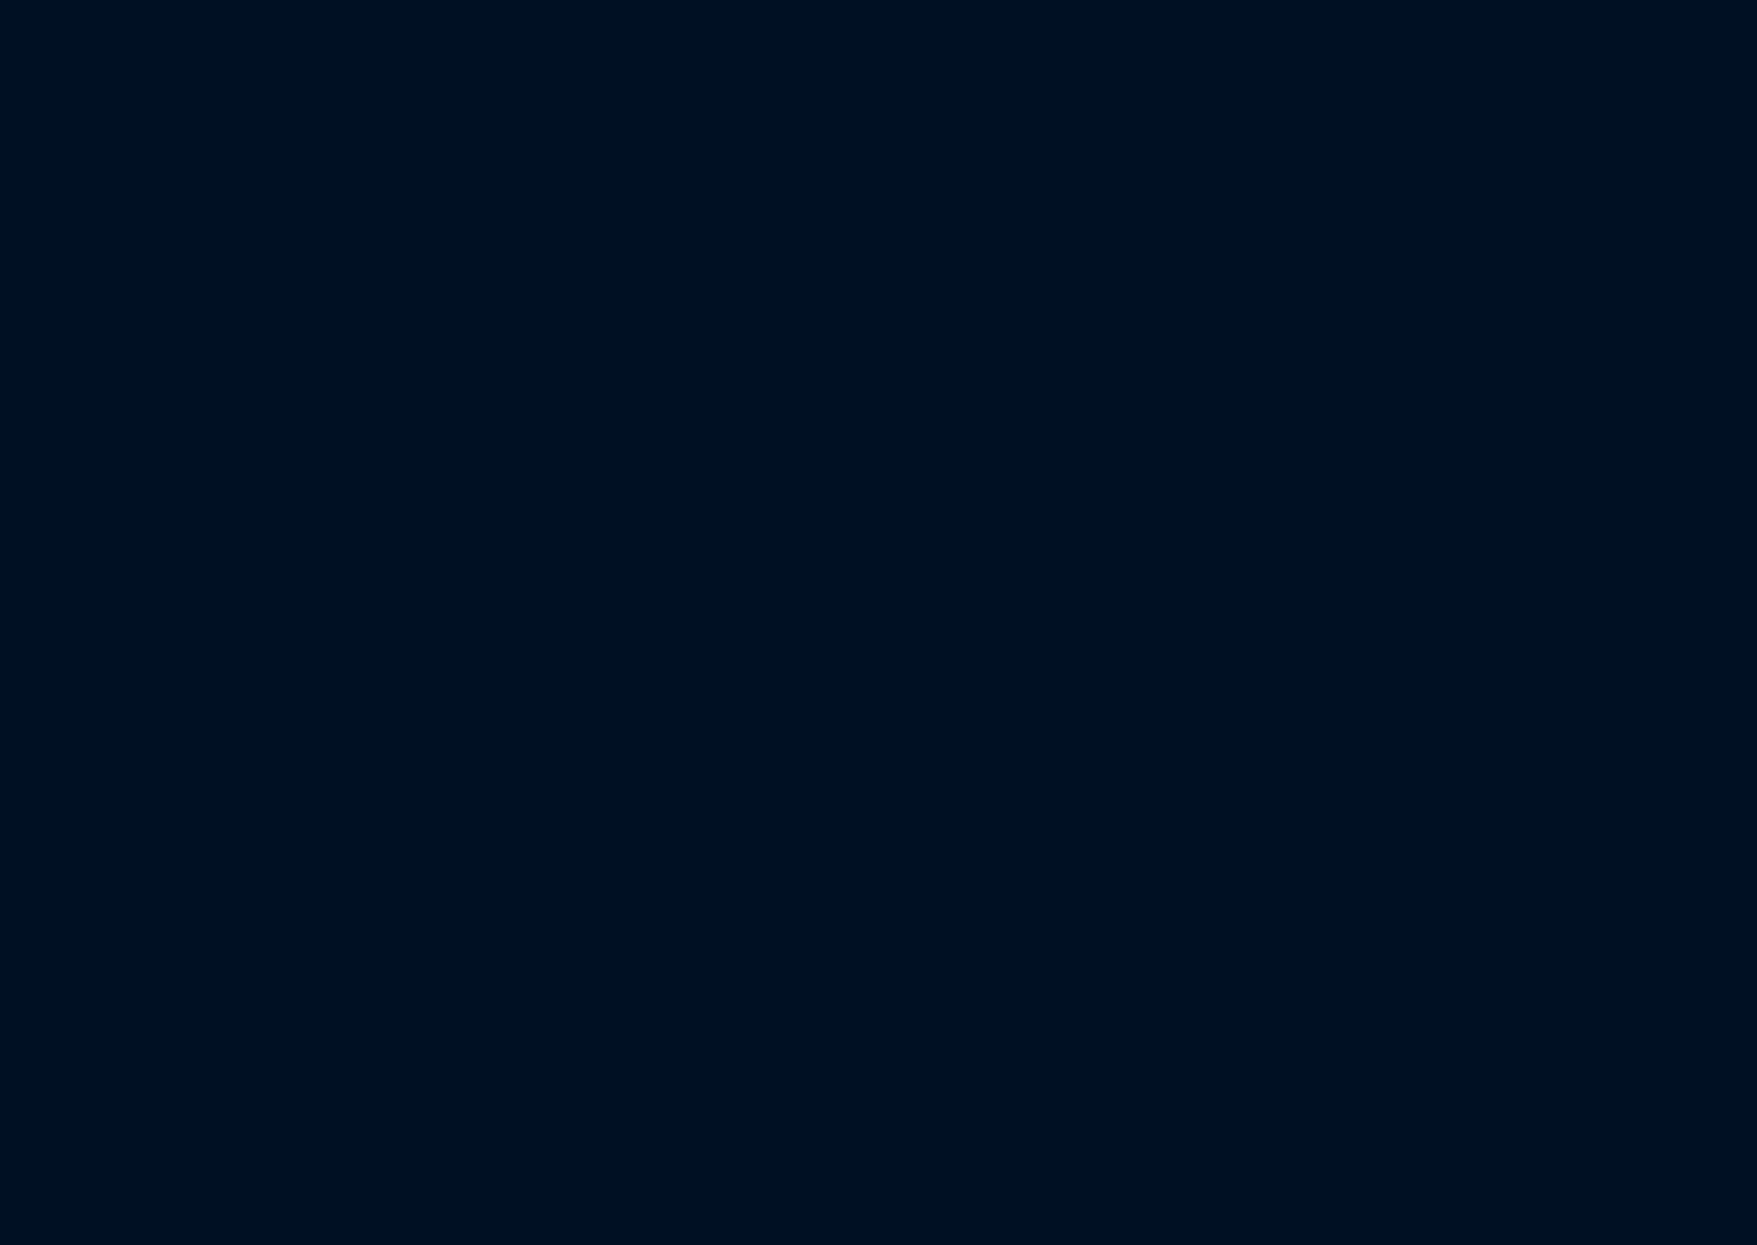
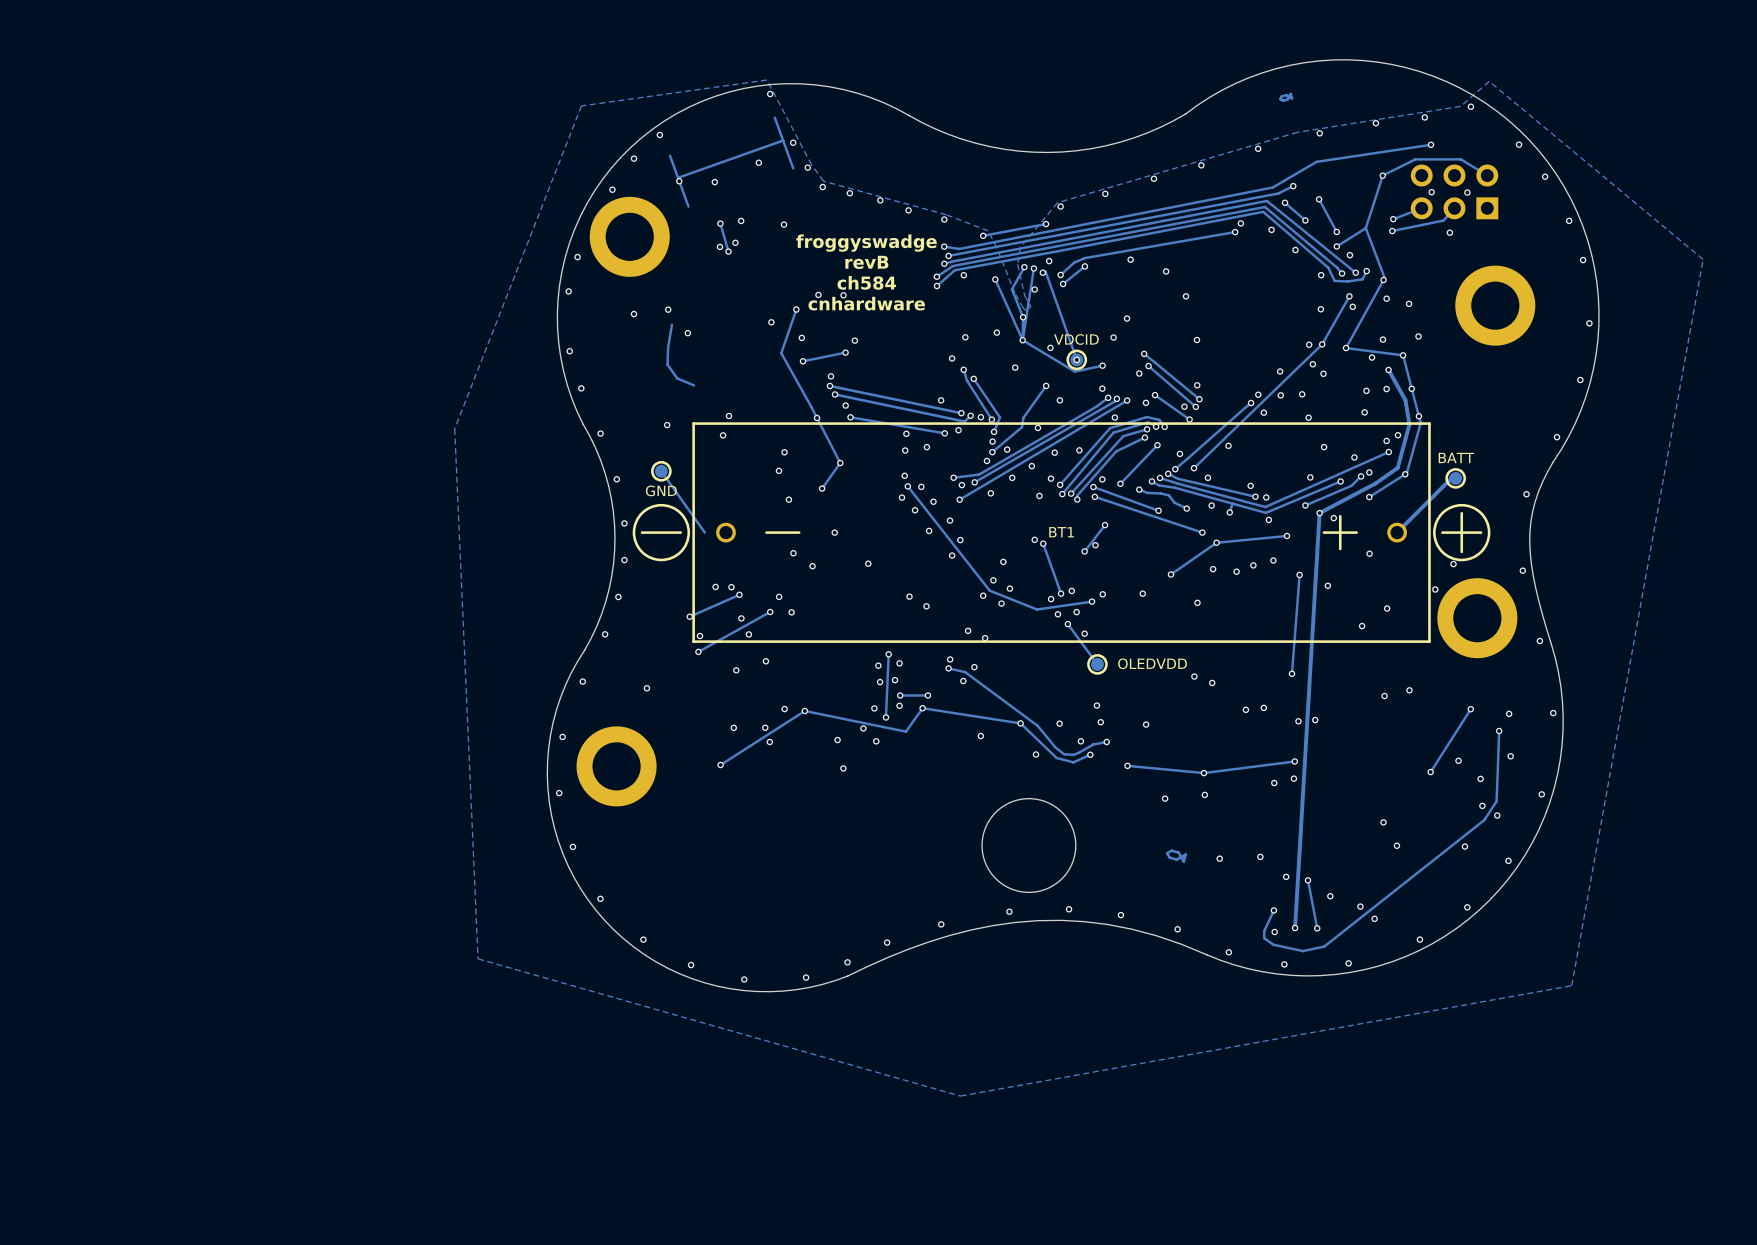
zone outline: none -> (766, 80) (811, 164) (823, 181) (946, 214) (988, 230) (1014, 293) (1025, 310) (1030, 306) (1024, 295) (1017, 264) (1020, 247) (1057, 202) (1297, 132) (1460, 106) (1489, 81) (1703, 259) (1571, 985) (960, 1096) (478, 958) (454, 428) (581, 105) (766, 80)
track: none -> (1290, 93) (1291, 98) (1286, 95) (1280, 99) (1287, 99) (1290, 93)
via: none -> (770, 94)
via: none -> (1470, 106)
board edge: none -> (1185, 114) (1159, 127) (1119, 142) (1076, 150) (1033, 152) (1004, 149) (962, 139) (935, 128) (883, 102) (843, 89) (800, 83) (757, 86) (729, 91) (702, 101) (664, 121) (630, 147) (610, 168) (594, 191) (574, 229) (565, 257) (558, 299) (557, 328) (560, 356) (567, 384) (576, 411) (600, 459) (608, 484) (614, 523) (614, 550) (609, 589) (601, 614) (590, 638) (565, 685) (556, 709) (548, 748) (547, 788) (554, 827) (562, 853) (573, 877) (587, 899) (604, 920) (623, 938) (644, 954) (667, 968) (704, 982) (743, 990) (783, 991) (809, 987) (835, 980) (908, 949) (971, 929) (1015, 922) (1060, 920) (1107, 924) (1131, 929) (1181, 944) (1234, 964) (1262, 971) (1305, 975) (1334, 974) (1363, 969) (1391, 961) (1418, 950) (1444, 936) (1467, 919) (1489, 900) (1508, 878) (1525, 854) (1539, 829) (1550, 802) (1557, 773) (1563, 730) (1562, 701) (1558, 672) (1538, 600) (1531, 563) (1530, 521) (1535, 501) (1542, 482) (1568, 437) (1580, 410) (1590, 383) (1597, 340) (1599, 311) (1596, 282) (1587, 239) (1577, 212) (1564, 186) (1547, 162) (1529, 140) (1508, 120) (1484, 102) (1459, 87) (1433, 76) (1405, 67) (1376, 62) (1347, 59) (1318, 60) (1290, 65) (1262, 72) (1234, 83) (1209, 97) (1185, 114)
track: none -> (774, 117) (793, 168)
via: none -> (1424, 117)
via: none -> (1375, 123)
via: none -> (1319, 133)
via: none -> (659, 134)
track: none -> (783, 140) (678, 177)
via: none -> (793, 142)
track: none -> (1431, 144) (1316, 161) (1272, 187) (959, 248) (944, 246)
via: none -> (1431, 144)
via: none -> (1519, 144)
via: none -> (1258, 148)
track: none -> (670, 155) (688, 206)
via: none -> (634, 158)
via: none -> (758, 162)
via: none -> (1201, 165)
via: none -> (807, 167)
via: none -> (1382, 175)
track: none -> (1487, 175) (1460, 159) (1415, 159) (1382, 175) (1365, 228)
via: none -> (1545, 176)
via: none -> (1153, 178)
via: none -> (679, 181)
via: none -> (714, 182)
track: none -> (1293, 186) (1278, 193) (948, 255)
via: none -> (1293, 186)
via: none -> (822, 187)
via: none -> (612, 189)
part: none -> (1454, 191)
via: none -> (1431, 192)
via: none -> (1467, 192)
via: none -> (849, 193)
via: none -> (1105, 193)
track: none -> (1319, 199) (1336, 231)
via: none -> (1319, 199)
via: none -> (880, 200)
track: none -> (1285, 202) (1305, 220)
via: none -> (1285, 202)
via: none -> (1060, 206)
track: none -> (1421, 208) (1393, 219)
track: none -> (1454, 208) (1443, 220) (1392, 231)
via: none -> (908, 210)
via: none -> (944, 219)
via: none -> (1393, 219)
via: none -> (741, 220)
via: none -> (1305, 220)
via: none -> (1569, 220)
track: none -> (720, 223) (728, 251)
via: none -> (720, 223)
via: none -> (1240, 223)
via: none -> (784, 224)
track: none -> (1046, 224) (983, 235)
via: none -> (1046, 224)
track: none -> (1365, 228) (1384, 278) (1346, 348) (1403, 355) (1420, 423) (1406, 472) (1369, 497)
track: none -> (1365, 228) (1336, 246)
via: none -> (1271, 229)
via: none -> (1336, 231)
via: none -> (1392, 231)
track: none -> (1235, 232) (1084, 258) (1074, 262) (1060, 274)
via: none -> (1235, 232)
via: none -> (1449, 232)
via: none -> (983, 235)
part: none -> (629, 236)
via: none -> (735, 242)
text: none -> froggyswadge (866, 243)
via: none -> (719, 246)
via: none -> (944, 246)
via: none -> (1336, 246)
via: none -> (1295, 250)
via: none -> (728, 251)
via: none -> (948, 255)
via: none -> (1349, 255)
via: none -> (577, 257)
via: none -> (1130, 259)
via: none -> (1583, 260)
via: none -> (1049, 261)
text: none -> revB (866, 262)
track: none -> (944, 263) (1266, 200) (1355, 272)
via: none -> (944, 263)
track: none -> (1084, 266) (1063, 283)
via: none -> (1084, 266)
track: none -> (1024, 267) (1011, 289) (1023, 317) (1022, 340)
via: none -> (1024, 267)
track: none -> (1033, 268) (1022, 340)
via: none -> (1033, 268)
via: none -> (1166, 271)
track: none -> (1366, 271) (1362, 279) (1334, 280) (1328, 267) (1263, 211) (954, 270) (936, 286)
via: none -> (1366, 271)
track: none -> (1042, 272) (1045, 271) (1076, 359)
via: none -> (1042, 272)
via: none -> (1355, 272)
track: none -> (1342, 273) (1265, 207) (952, 266) (936, 276)
via: none -> (1342, 273)
via: none -> (1060, 274)
via: none -> (963, 275)
via: none -> (1321, 275)
via: none -> (936, 276)
track: none -> (995, 279) (1022, 340)
via: none -> (995, 279)
via: none -> (1383, 280)
text: none -> ch584 (866, 282)
via: none -> (1063, 283)
via: none -> (936, 286)
via: none -> (1034, 289)
via: none -> (568, 291)
via: none -> (818, 294)
via: none -> (843, 295)
via: none -> (1186, 296)
track: none -> (1349, 296) (1322, 344) (1194, 468)
via: none -> (1349, 296)
via: none -> (1386, 298)
text: none -> cnhardware (866, 303)
via: none -> (1409, 303)
part: none -> (1495, 305)
via: none -> (1352, 306)
via: none -> (668, 309)
track: none -> (796, 309) (781, 353) (840, 463) (822, 488)
via: none -> (796, 309)
via: none -> (1320, 309)
via: none -> (634, 314)
via: none -> (1023, 317)
via: none -> (1127, 318)
via: none -> (771, 322)
via: none -> (1589, 323)
track: none -> (671, 324) (667, 364) (677, 378) (694, 385)
via: none -> (996, 332)
via: none -> (687, 333)
via: none -> (1418, 336)
via: none -> (801, 337)
via: none -> (965, 337)
via: none -> (1113, 337)
via: none -> (1196, 339)
via: none -> (1382, 339)
via: none -> (854, 340)
track: none -> (1022, 340) (1074, 371) (1102, 365)
via: none -> (1022, 340)
via: none -> (1309, 344)
via: none -> (1322, 344)
via: none -> (1050, 347)
via: none -> (1346, 348)
via: none -> (569, 351)
track: none -> (845, 352) (802, 361)
via: none -> (845, 352)
track: none -> (1144, 353) (1199, 399)
via: none -> (1144, 353)
via: none -> (1403, 355)
via: none -> (1372, 357)
via: none -> (952, 358)
part: none -> VDCID (1076, 359)
via: none -> (1076, 359)
via: none -> (802, 361)
via: none -> (1312, 364)
via: none -> (1102, 365)
track: none -> (1148, 366) (1195, 406)
via: none -> (1148, 366)
via: none -> (1015, 367)
track: none -> (963, 369) (967, 380) (991, 419)
via: none -> (963, 369)
track: none -> (1388, 369) (1405, 400) (1409, 424) (1397, 467) (1375, 483) (1319, 513) (1295, 928)
via: none -> (1388, 369)
via: none -> (1280, 371)
via: none -> (1139, 373)
via: none -> (1323, 373)
via: none -> (831, 376)
track: none -> (973, 378) (999, 417) (994, 431)
via: none -> (973, 378)
via: none -> (1580, 380)
track: none -> (829, 385) (961, 413)
via: none -> (829, 385)
track: none -> (1046, 385) (1023, 417) (1022, 427) (992, 452)
via: none -> (1046, 385)
via: none -> (1197, 385)
via: none -> (581, 388)
via: none -> (1102, 388)
via: none -> (1411, 388)
via: none -> (1386, 389)
via: none -> (1366, 390)
track: none -> (835, 394) (964, 421) (970, 415)
via: none -> (835, 394)
via: none -> (1258, 394)
via: none -> (1302, 394)
track: none -> (1155, 395) (1189, 419)
via: none -> (1155, 395)
via: none -> (1280, 395)
track: none -> (1108, 397) (1096, 406) (979, 474) (953, 477)
via: none -> (1108, 397)
track: none -> (1116, 398) (974, 482)
via: none -> (1116, 398)
via: none -> (1199, 399)
via: none -> (941, 400)
via: none -> (1059, 400)
track: none -> (1127, 400) (959, 499)
via: none -> (1127, 400)
via: none -> (1145, 402)
track: none -> (1251, 402) (1175, 469)
via: none -> (1251, 402)
via: none -> (845, 405)
via: none -> (1184, 406)
via: none -> (1195, 406)
via: none -> (1263, 412)
via: none -> (1364, 412)
via: none -> (961, 413)
via: none -> (970, 415)
via: none -> (729, 416)
via: none -> (1418, 416)
via: none -> (817, 417)
track: none -> (850, 417) (944, 433)
via: none -> (850, 417)
via: none -> (980, 417)
via: none -> (1114, 417)
via: none -> (1308, 417)
via: none -> (991, 419)
via: none -> (1189, 419)
via: none -> (667, 425)
track: none -> (1156, 426) (1148, 422) (1113, 432) (1062, 494)
via: none -> (1156, 426)
track: none -> (1164, 426) (1159, 419) (1146, 417) (1110, 428) (1060, 484)
via: none -> (1164, 426)
via: none -> (1037, 427)
track: none -> (1147, 429) (1123, 436) (1071, 493)
via: none -> (1147, 429)
via: none -> (958, 430)
via: none -> (994, 431)
via: none -> (600, 433)
via: none -> (906, 433)
via: none -> (944, 433)
via: none -> (723, 435)
via: none -> (1397, 435)
track: none -> (1144, 437) (1116, 451) (1077, 495) (1077, 499)
via: none -> (1144, 437)
via: none -> (1557, 437)
via: none -> (1386, 440)
via: none -> (992, 441)
track: none -> (1157, 445) (1120, 483)
via: none -> (1157, 445)
via: none -> (1228, 445)
via: none -> (926, 447)
via: none -> (1324, 447)
via: none -> (1007, 449)
via: none -> (905, 450)
via: none -> (1079, 450)
via: none -> (784, 452)
via: none -> (992, 452)
via: none -> (1054, 452)
track: none -> (1388, 452) (1265, 507) (1160, 477)
via: none -> (1388, 452)
via: none -> (1179, 453)
via: none -> (1354, 457)
via: none -> (986, 460)
via: none -> (840, 463)
via: none -> (1031, 466)
via: none -> (1194, 468)
via: none -> (1175, 469)
via: none -> (778, 470)
track: none -> (661, 471) (704, 532)
part: none -> GND (661, 471)
via: none -> (1369, 472)
track: none -> (1168, 473) (1177, 478) (1255, 496)
via: none -> (1168, 473)
via: none -> (1405, 474)
via: none -> (904, 475)
track: none -> (1361, 476) (1351, 485) (1305, 505)
via: none -> (1361, 476)
via: none -> (953, 477)
via: none -> (1012, 477)
via: none -> (1160, 477)
via: none -> (1207, 477)
via: none -> (1310, 477)
via: none -> (1050, 478)
track: none -> (1455, 478) (1451, 478) (1397, 532)
part: none -> BATT (1455, 478)
via: none -> (616, 479)
via: none -> (1102, 479)
via: none -> (1151, 481)
track: none -> (1340, 481) (1265, 512) (1175, 487) (1158, 485) (1151, 481)
via: none -> (1340, 481)
via: none -> (974, 482)
via: none -> (1120, 483)
via: none -> (1060, 484)
via: none -> (961, 485)
via: none -> (1250, 485)
track: none -> (907, 486) (989, 590) (1037, 609) (1092, 601)
via: none -> (907, 486)
via: none -> (921, 486)
track: none -> (1093, 487) (1158, 510)
via: none -> (1093, 487)
via: none -> (822, 488)
track: none -> (1139, 489) (1147, 492) (1168, 495) (1174, 502) (1186, 508)
via: none -> (1139, 489)
via: none -> (990, 493)
via: none -> (1071, 493)
via: none -> (1062, 494)
via: none -> (1526, 494)
via: none -> (1039, 495)
track: none -> (1094, 496) (1202, 532)
via: none -> (1094, 496)
via: none -> (1255, 496)
via: none -> (902, 497)
via: none -> (1266, 497)
via: none -> (1369, 497)
via: none -> (788, 499)
via: none -> (959, 499)
via: none -> (1077, 499)
via: none -> (933, 501)
track: none -> (1232, 503) (1229, 512)
via: none -> (1211, 505)
via: none -> (1305, 505)
via: none -> (1186, 508)
via: none -> (915, 510)
via: none -> (1158, 510)
via: none -> (1229, 512)
via: none -> (1319, 513)
via: none -> (1333, 518)
via: none -> (1268, 519)
via: none -> (950, 520)
via: none -> (624, 523)
track: none -> (1105, 525) (1084, 551)
via: none -> (1105, 525)
via: none -> (929, 530)
via: none -> (834, 532)
BT1: none -> (1061, 532)
via: none -> (1202, 532)
track: none -> (1286, 535) (1216, 542) (1170, 574)
via: none -> (1286, 535)
via: none -> (1034, 539)
via: none -> (960, 540)
via: none -> (1216, 542)
track: none -> (1043, 543) (1061, 593)
via: none -> (1043, 543)
via: none -> (1095, 545)
via: none -> (1084, 551)
via: none -> (793, 553)
via: none -> (1369, 553)
via: none -> (952, 555)
via: none -> (624, 560)
via: none -> (1273, 560)
via: none -> (1003, 561)
via: none -> (868, 563)
via: none -> (1453, 564)
via: none -> (1253, 565)
via: none -> (812, 566)
via: none -> (1213, 569)
via: none -> (1522, 570)
via: none -> (1236, 571)
via: none -> (1170, 574)
track: none -> (1299, 574) (1291, 673)
via: none -> (1299, 574)
via: none -> (993, 580)
via: none -> (1327, 585)
via: none -> (715, 586)
via: none -> (731, 587)
via: none -> (1009, 588)
via: none -> (1435, 589)
via: none -> (1071, 590)
via: none -> (1061, 593)
via: none -> (1142, 593)
track: none -> (739, 594) (689, 616)
via: none -> (739, 594)
via: none -> (1102, 594)
via: none -> (983, 595)
via: none -> (779, 596)
via: none -> (909, 596)
via: none -> (618, 597)
via: none -> (1051, 599)
via: none -> (1092, 601)
via: none -> (1197, 602)
via: none -> (1001, 603)
via: none -> (926, 606)
via: none -> (1387, 608)
track: none -> (770, 611) (698, 651)
via: none -> (770, 611)
via: none -> (791, 612)
via: none -> (1076, 612)
via: none -> (1057, 614)
via: none -> (689, 616)
via: none -> (741, 618)
part: none -> (1477, 618)
track: none -> (1067, 624) (1097, 664)
via: none -> (1067, 624)
via: none -> (1362, 626)
via: none -> (968, 630)
via: none -> (1084, 633)
via: none -> (605, 634)
via: none -> (748, 634)
via: none -> (699, 636)
via: none -> (985, 638)
via: none -> (1539, 641)
via: none -> (698, 651)
track: none -> (888, 654) (885, 717)
via: none -> (888, 654)
via: none -> (950, 659)
via: none -> (765, 661)
via: none -> (899, 663)
part: none -> OLEDVDD (1097, 664)
via: none -> (878, 665)
via: none -> (974, 667)
track: none -> (948, 668) (965, 672) (1037, 725) (1055, 747) (1064, 754) (1073, 754) (1093, 744) (1106, 741)
via: none -> (948, 668)
via: none -> (736, 670)
via: none -> (1291, 673)
via: none -> (1194, 676)
via: none -> (895, 680)
via: none -> (582, 681)
via: none -> (963, 681)
via: none -> (880, 682)
via: none -> (1212, 682)
via: none -> (646, 688)
via: none -> (1409, 690)
via: none -> (900, 695)
track: none -> (927, 695) (900, 695)
via: none -> (927, 695)
via: none -> (1384, 696)
via: none -> (899, 705)
via: none -> (1096, 705)
via: none -> (1263, 707)
via: none -> (874, 708)
via: none -> (922, 708)
via: none -> (784, 709)
via: none -> (1245, 709)
track: none -> (1470, 709) (1430, 772)
via: none -> (1470, 709)
via: none -> (804, 711)
via: none -> (1509, 713)
via: none -> (1553, 713)
via: none -> (885, 717)
via: none -> (1315, 720)
via: none -> (1298, 721)
via: none -> (1100, 722)
via: none -> (1020, 723)
via: none -> (1059, 723)
via: none -> (1146, 724)
via: none -> (733, 727)
via: none -> (765, 727)
via: none -> (863, 728)
track: none -> (1499, 731) (1496, 801) (1484, 820) (1324, 946) (1302, 951) (1273, 944) (1264, 938) (1264, 931) (1273, 910)
via: none -> (1499, 731)
via: none -> (562, 736)
via: none -> (980, 736)
via: none -> (837, 740)
via: none -> (769, 741)
via: none -> (876, 741)
via: none -> (1080, 741)
via: none -> (1106, 741)
via: none -> (1035, 754)
track: none -> (1090, 754) (1073, 762) (1056, 757) (1020, 723) (922, 708) (906, 731) (804, 711) (720, 764)
via: none -> (1090, 754)
via: none -> (1510, 756)
via: none -> (1458, 760)
track: none -> (1294, 761) (1203, 773) (1127, 765)
via: none -> (1294, 761)
via: none -> (720, 764)
via: none -> (1127, 765)
part: none -> (616, 766)
via: none -> (843, 768)
via: none -> (1430, 772)
via: none -> (1203, 773)
via: none -> (1293, 778)
via: none -> (1480, 778)
via: none -> (1274, 783)
via: none -> (559, 793)
via: none -> (1204, 794)
via: none -> (1541, 794)
round board edge: none -> [981, 798, 1077, 893]
via: none -> (1165, 798)
via: none -> (1482, 805)
via: none -> (1497, 815)
via: none -> (1383, 822)
via: none -> (1396, 845)
via: none -> (572, 846)
via: none -> (1464, 846)
track: none -> (1171, 850) (1178, 852) (1183, 861) (1185, 854) (1176, 859) (1169, 857) (1167, 853) (1171, 850)
via: none -> (1260, 856)
via: none -> (1219, 858)
via: none -> (1508, 860)
via: none -> (1286, 876)
track: none -> (1307, 880) (1317, 928)
via: none -> (1307, 880)
via: none -> (1330, 896)
via: none -> (600, 898)
via: none -> (1360, 906)
via: none -> (1467, 907)
via: none -> (1069, 909)
via: none -> (1273, 910)
via: none -> (1009, 911)
via: none -> (1120, 915)
via: none -> (1374, 918)
via: none -> (941, 924)
via: none -> (1295, 928)
via: none -> (1317, 928)
via: none -> (1177, 929)
via: none -> (1274, 932)
via: none -> (643, 939)
via: none -> (1419, 939)
via: none -> (887, 942)
via: none -> (1228, 952)
via: none -> (847, 962)
via: none -> (1348, 963)
via: none -> (1284, 964)
via: none -> (691, 965)
via: none -> (806, 977)
via: none -> (744, 979)

